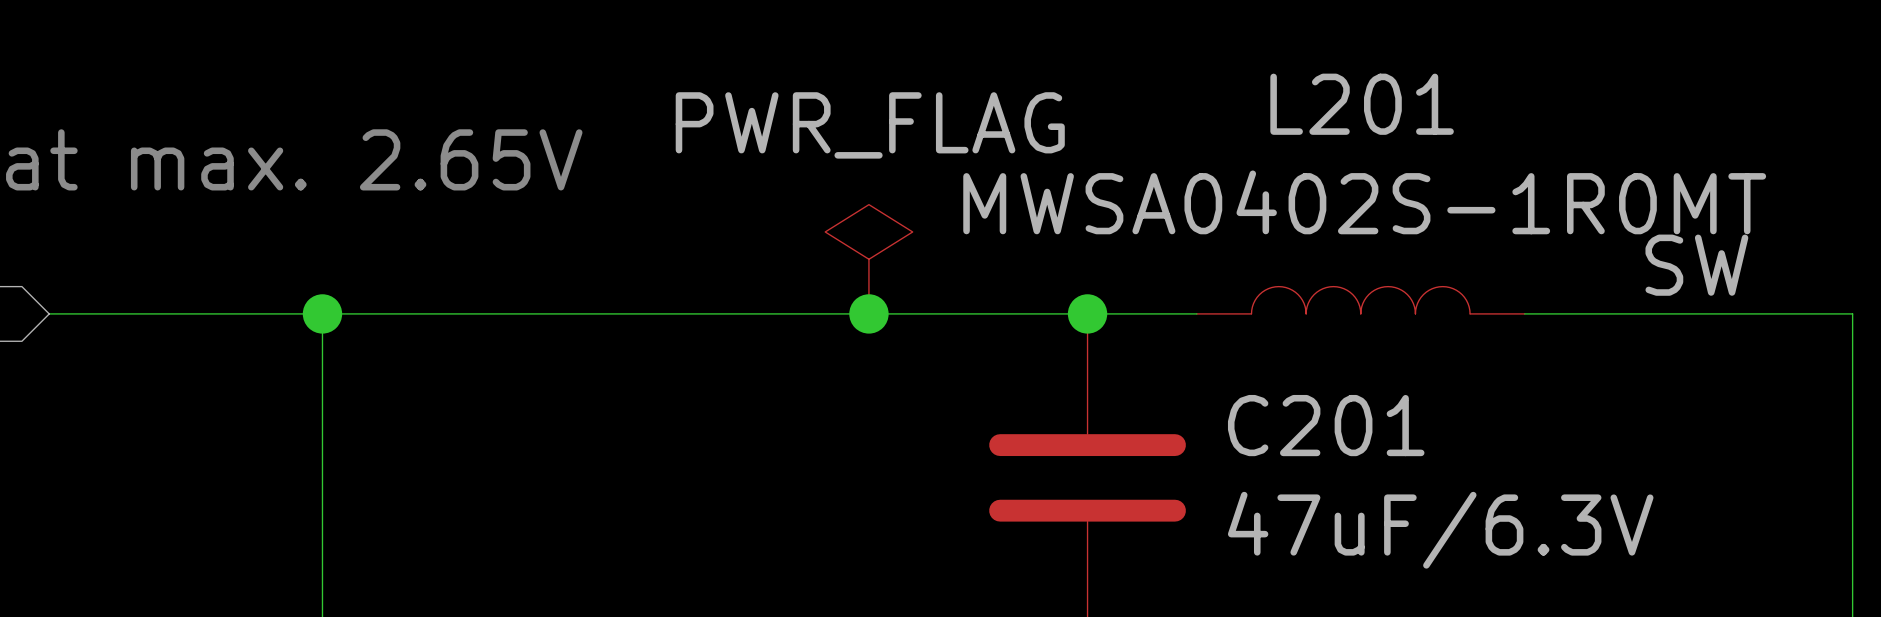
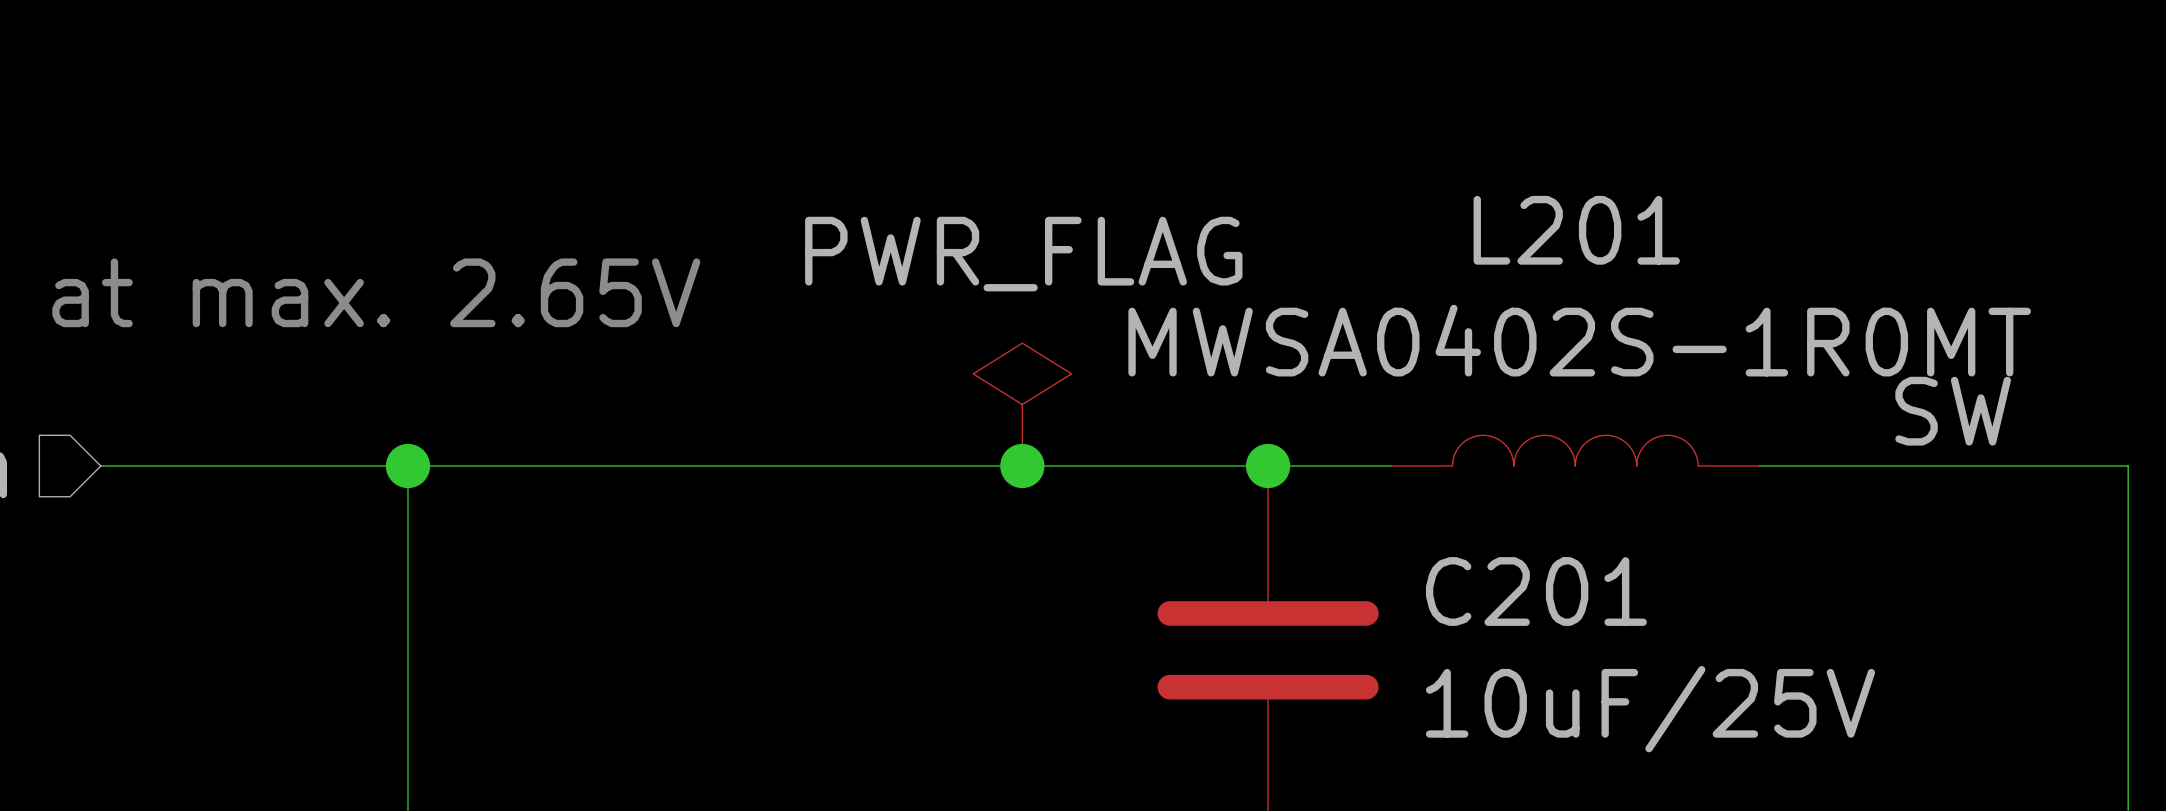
C201 value: 47uF/6.3V (1440, 530) -> 10uF/25V (1650, 709)

